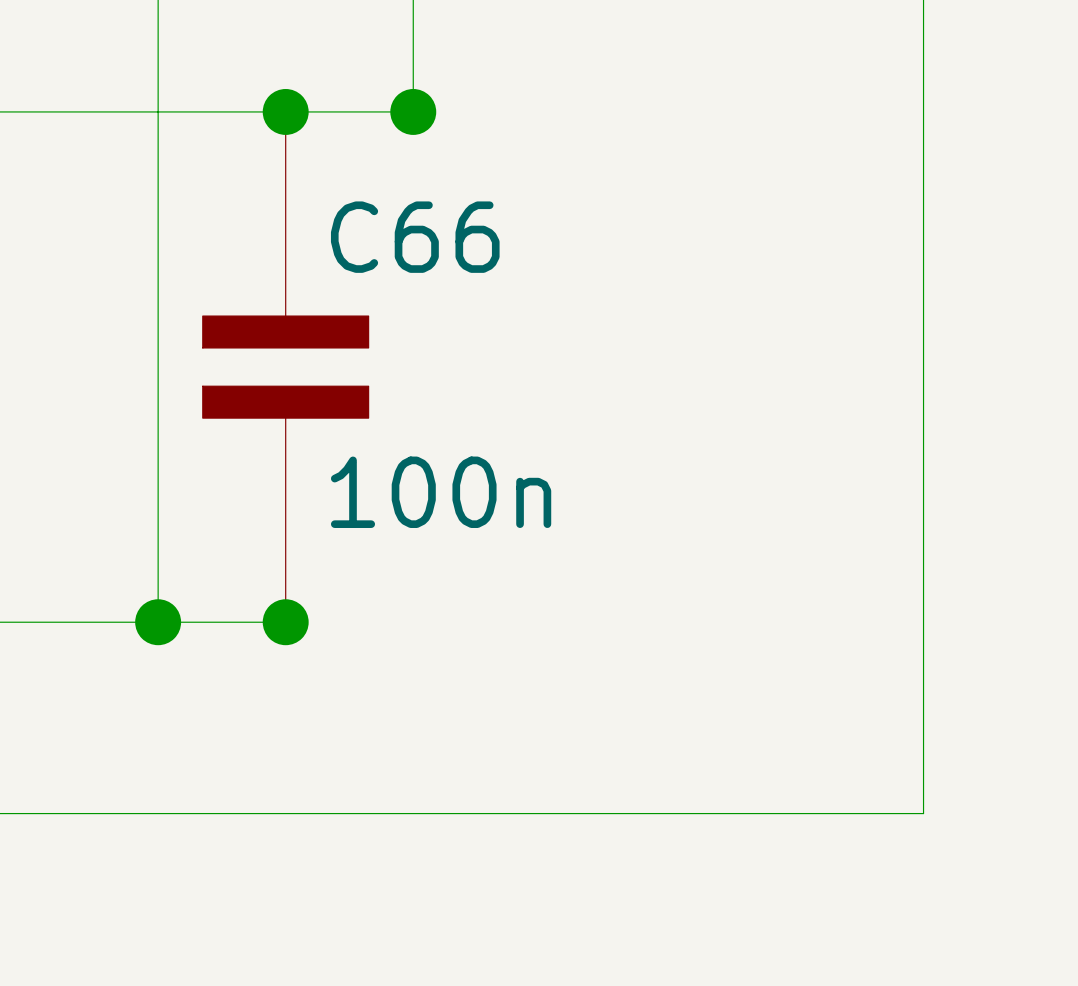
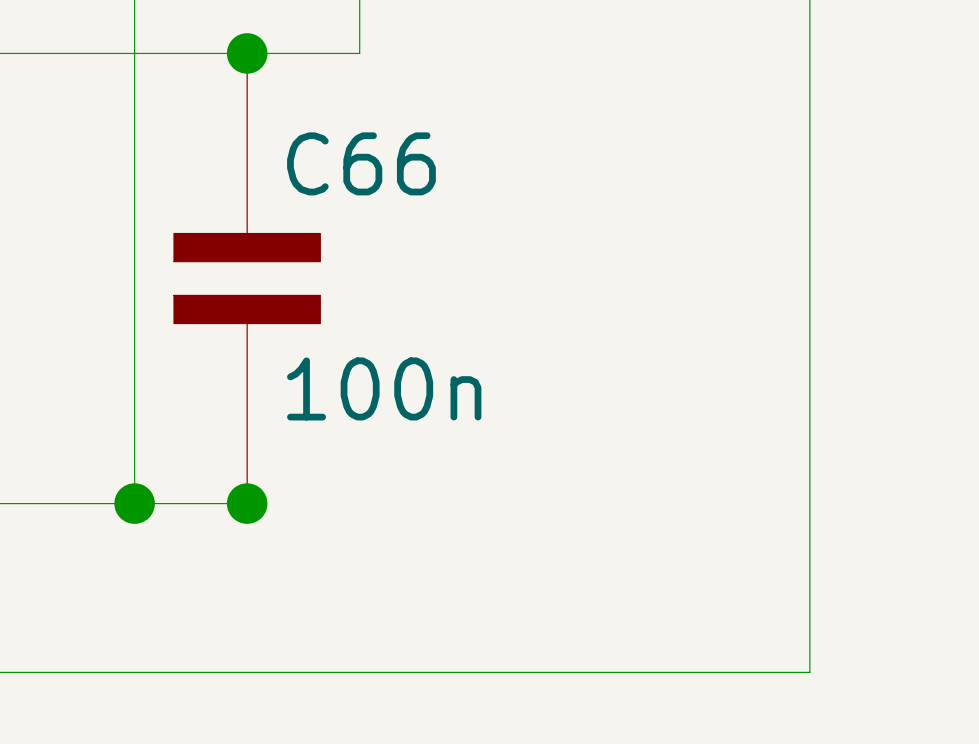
junction: (413, 111) -> none

